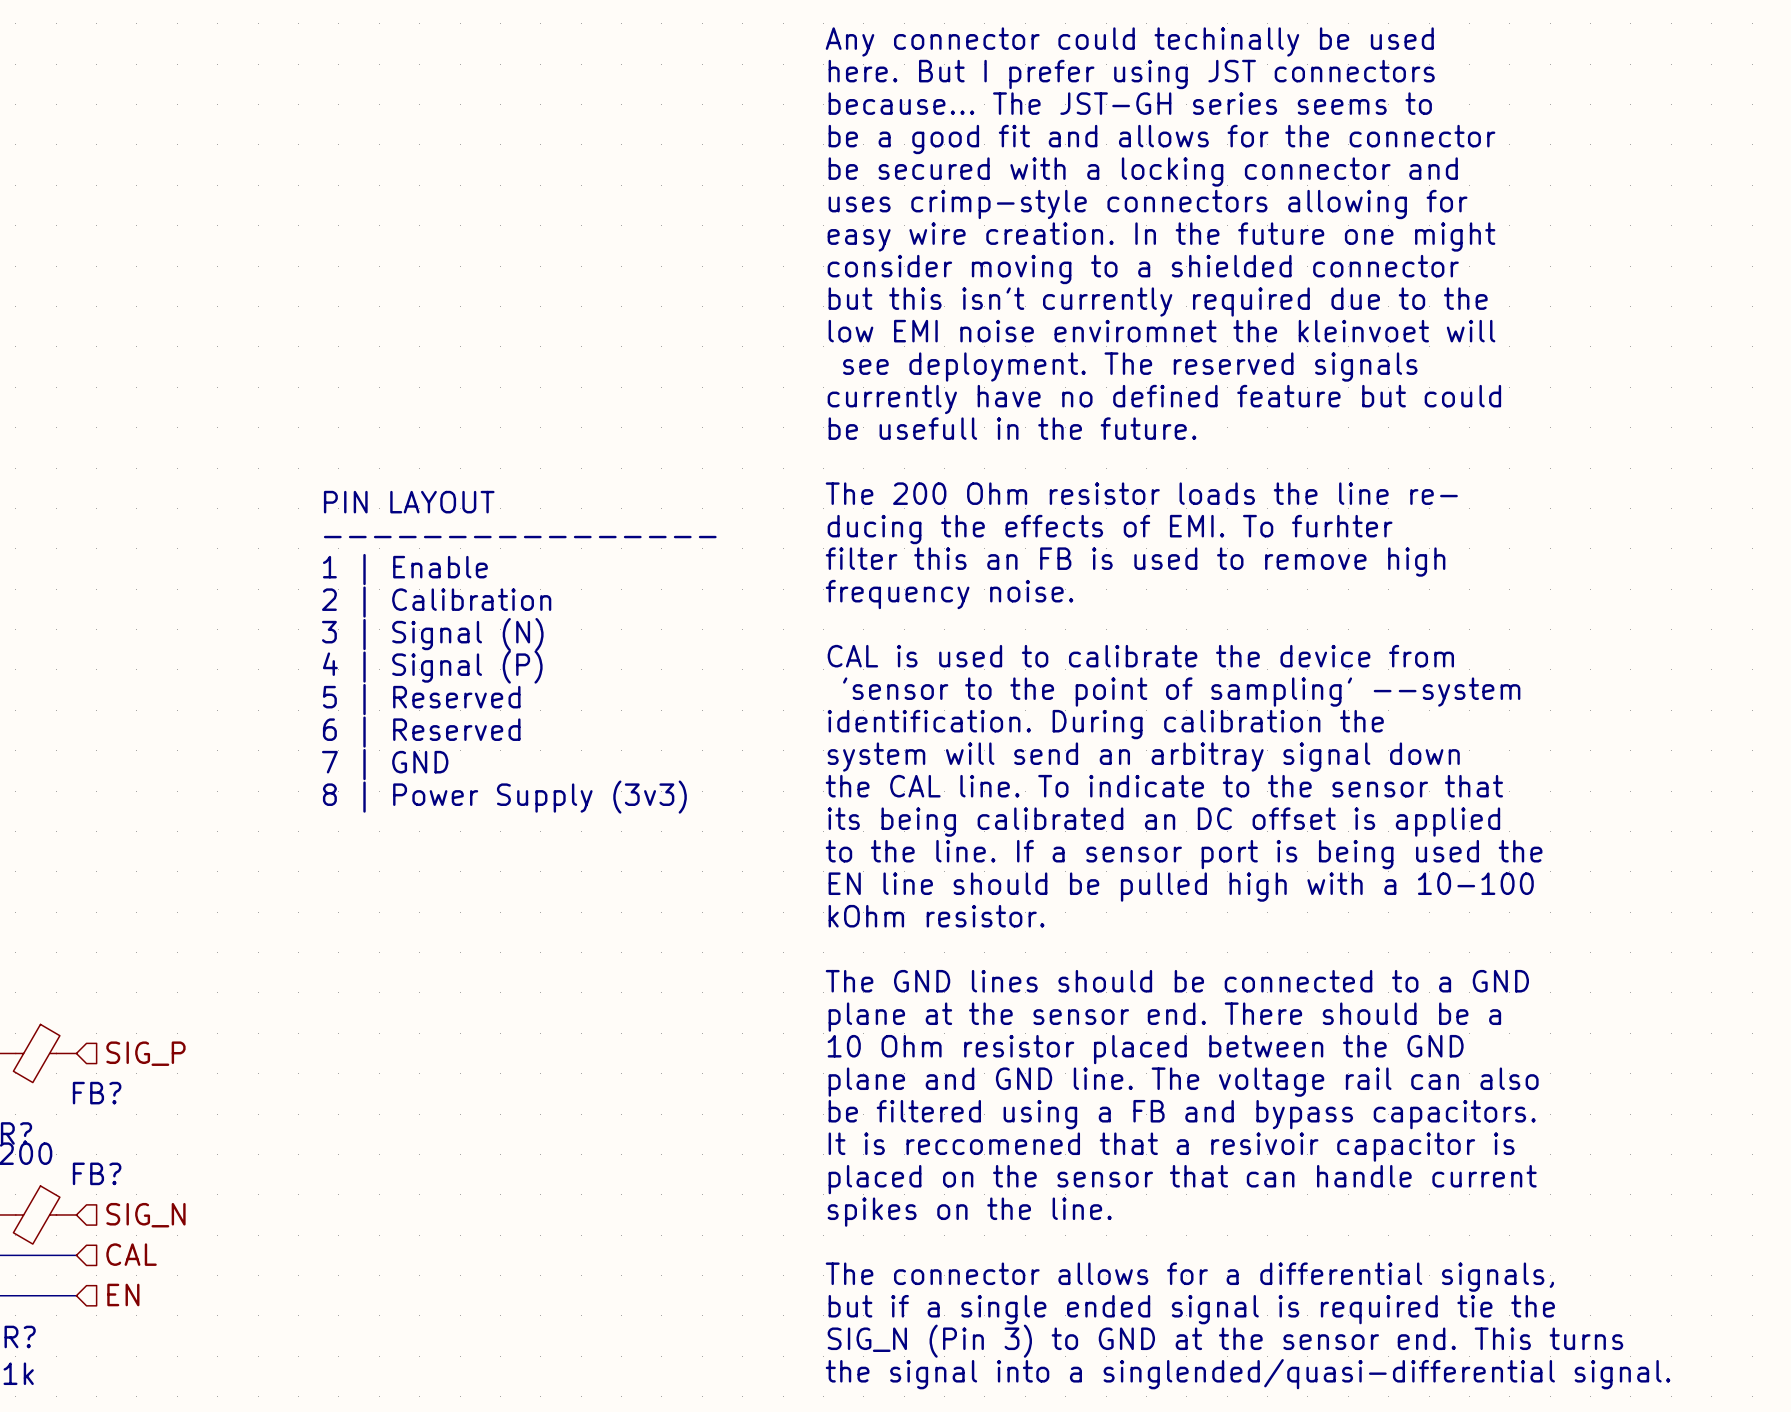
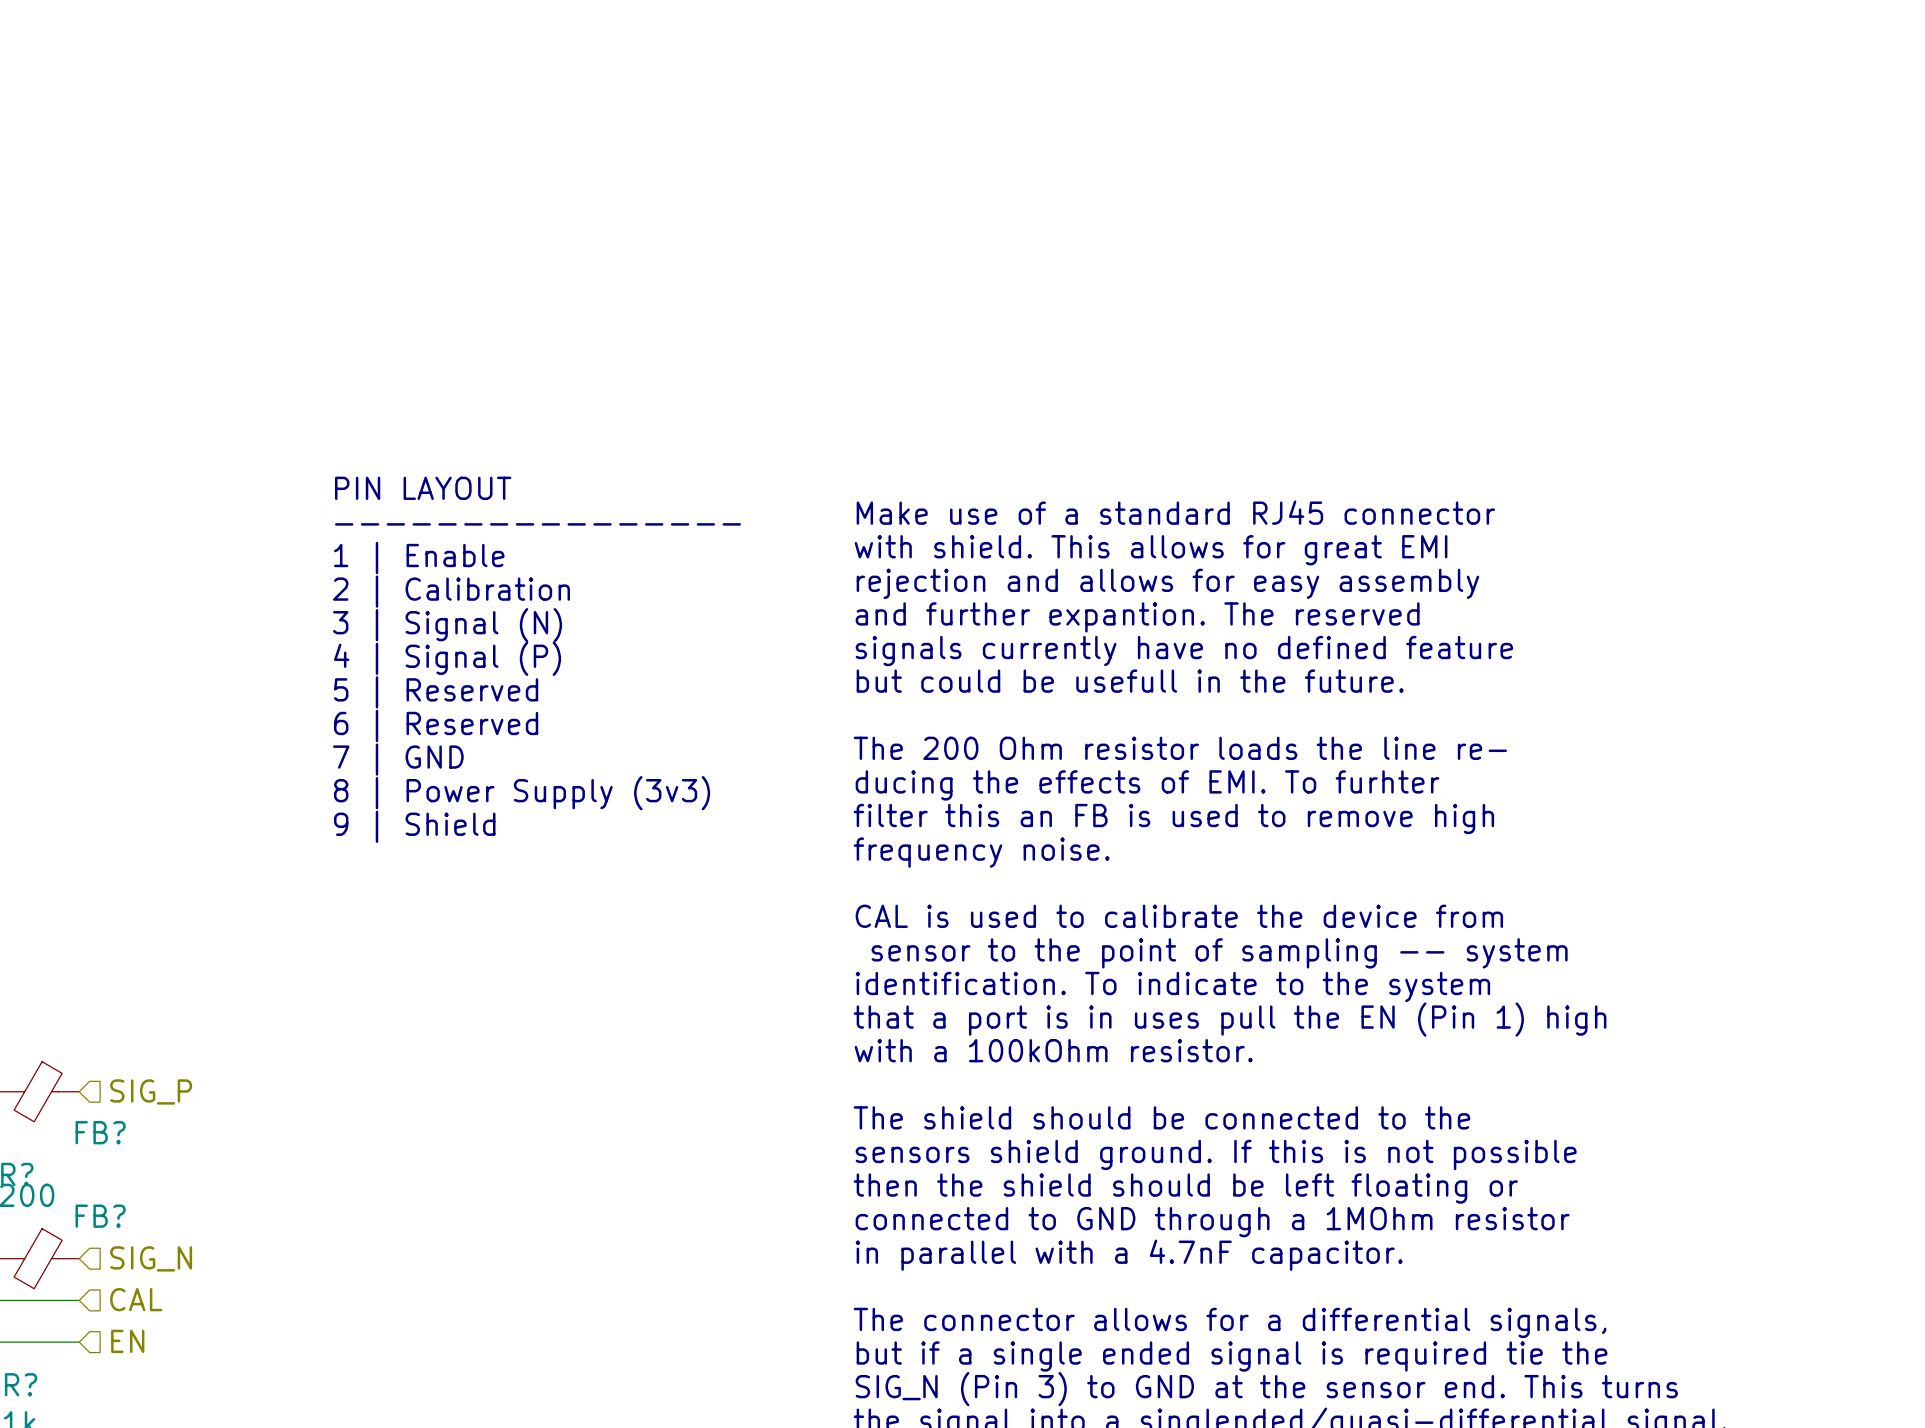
text: Any connector could techinally be used (1129, 41) -> none
text: here. But I prefer using JST connectors (1131, 74) -> none
text: because... The JST-GH series seems to (1130, 103) -> none
text: be a good fit and allows for the connector (1161, 139) -> none
text: be secured with a locking connector and (1143, 171) -> none
text: uses crimp-style connectors allowing for (1148, 204) -> none
text: easy wire creation. In the future one might (1161, 236) -> none
text: consider moving to a shielded connector (1143, 269) -> none
text: but this isn't currently required due to the (1158, 301) -> none
text: low EMI noise enviromnet the kleinvoet will (1161, 331) -> none
text: see deployment. The reserved signals (1130, 367) -> none
text: currently have no defined feature but could (1164, 399) -> none
text: be usefull in the future. (1012, 428) -> none
text: none -> PIN LAYOUT (423, 488)
text: The 200 Ohm resistor loads the line re- (1141, 493) -> Make use of a standard RJ45 connector (1175, 512)
text: PIN LAYOUT (409, 502) -> ---------------- (537, 524)
text: ducing the effects of EMI. To furhter (1110, 529) -> with shield. This allows for great EMI (1151, 550)
text: ---------------- (520, 537) -> 1 | Enable (419, 557)
text: filter this an FB is used to remove high (1135, 562) -> rejection and allows for easy assembly (1167, 583)
text: 1 | Enable (405, 569) -> 2 | Calibration (451, 591)
text: frequency noise. (949, 594) -> and further expantion. The reserved (1137, 617)
text: 2 | Calibration (436, 602) -> 3 | Signal (N) (447, 625)
text: none -> signals currently have no defined feature (1184, 651)
text: 3 | Signal (N) (432, 634) -> 4 | Signal (P) (447, 658)
text: CAL is used to calibrate the device from (1140, 656) -> but could be usefull in the future. (1130, 681)
text: 4 | Signal (P) (432, 667) -> 5 | Reserved (436, 692)
text: 'sensor to the point of sampling' --system (1181, 692) -> none
text: 5 | Reserved (421, 699) -> 6 | Reserved (436, 725)
text: identification. During calibration the (1105, 724) -> The 200 Ohm resistor loads the line re- (1180, 748)
text: 6 | Reserved (421, 732) -> 7 | GND (398, 759)
text: system will send an arbitray signal down (1143, 757) -> ducing the effects of EMI. To furhter (1147, 785)
text: 7 | GND (385, 764) -> 8 | Power Supply (3v3) (522, 793)
text: the CAL line. To indicate to the sensor that (1164, 786) -> filter this an FB is used to remove high (1173, 818)
text: 8 | Power Supply (3v3) (504, 797) -> 9 | Shield (414, 826)
text: its being calibrated an DC offset is applied (1163, 822) -> frequency noise. (981, 852)
text: to the line. If a sensor port is being used the (1184, 854) -> none
text: EN line should be pulled high with a 10-100 (1181, 887) -> CAL is used to calibrate the device from (1179, 916)
text: kOhm resistor. (936, 916) -> sensor to the point of sampling -- system (1219, 953)
text: none -> identification. To indicate to the system (1172, 986)
text: The GND lines should be connected to a GND (1177, 981) -> that a port is in uses pull the EN (Pin 1) high (1230, 1019)
text: plane at the sensor end. There should be a (1164, 1017) -> with a 100kOhm resistor. (1053, 1050)
text: 10 Ohm resistor placed between the GND (1145, 1049) -> none
text: plane and GND line. The voltage rail can also (1183, 1082) -> The shield should be connected to the (1161, 1117)
text: be filtered using a FB and bypass capacitors. (1182, 1114) -> sensors shield ground. If this is not possible (1216, 1154)
text: It is reccomened that a resivoir capacitor is (1171, 1147) -> then the shield should be left floating or (1185, 1188)
text: placed on the sensor that can handle current (1182, 1179) -> connected to GND through a 1MOhm resistor (1212, 1222)
text: spikes on the line. (969, 1212) -> in parallel with a 4.7nF capacitor. (1129, 1255)

